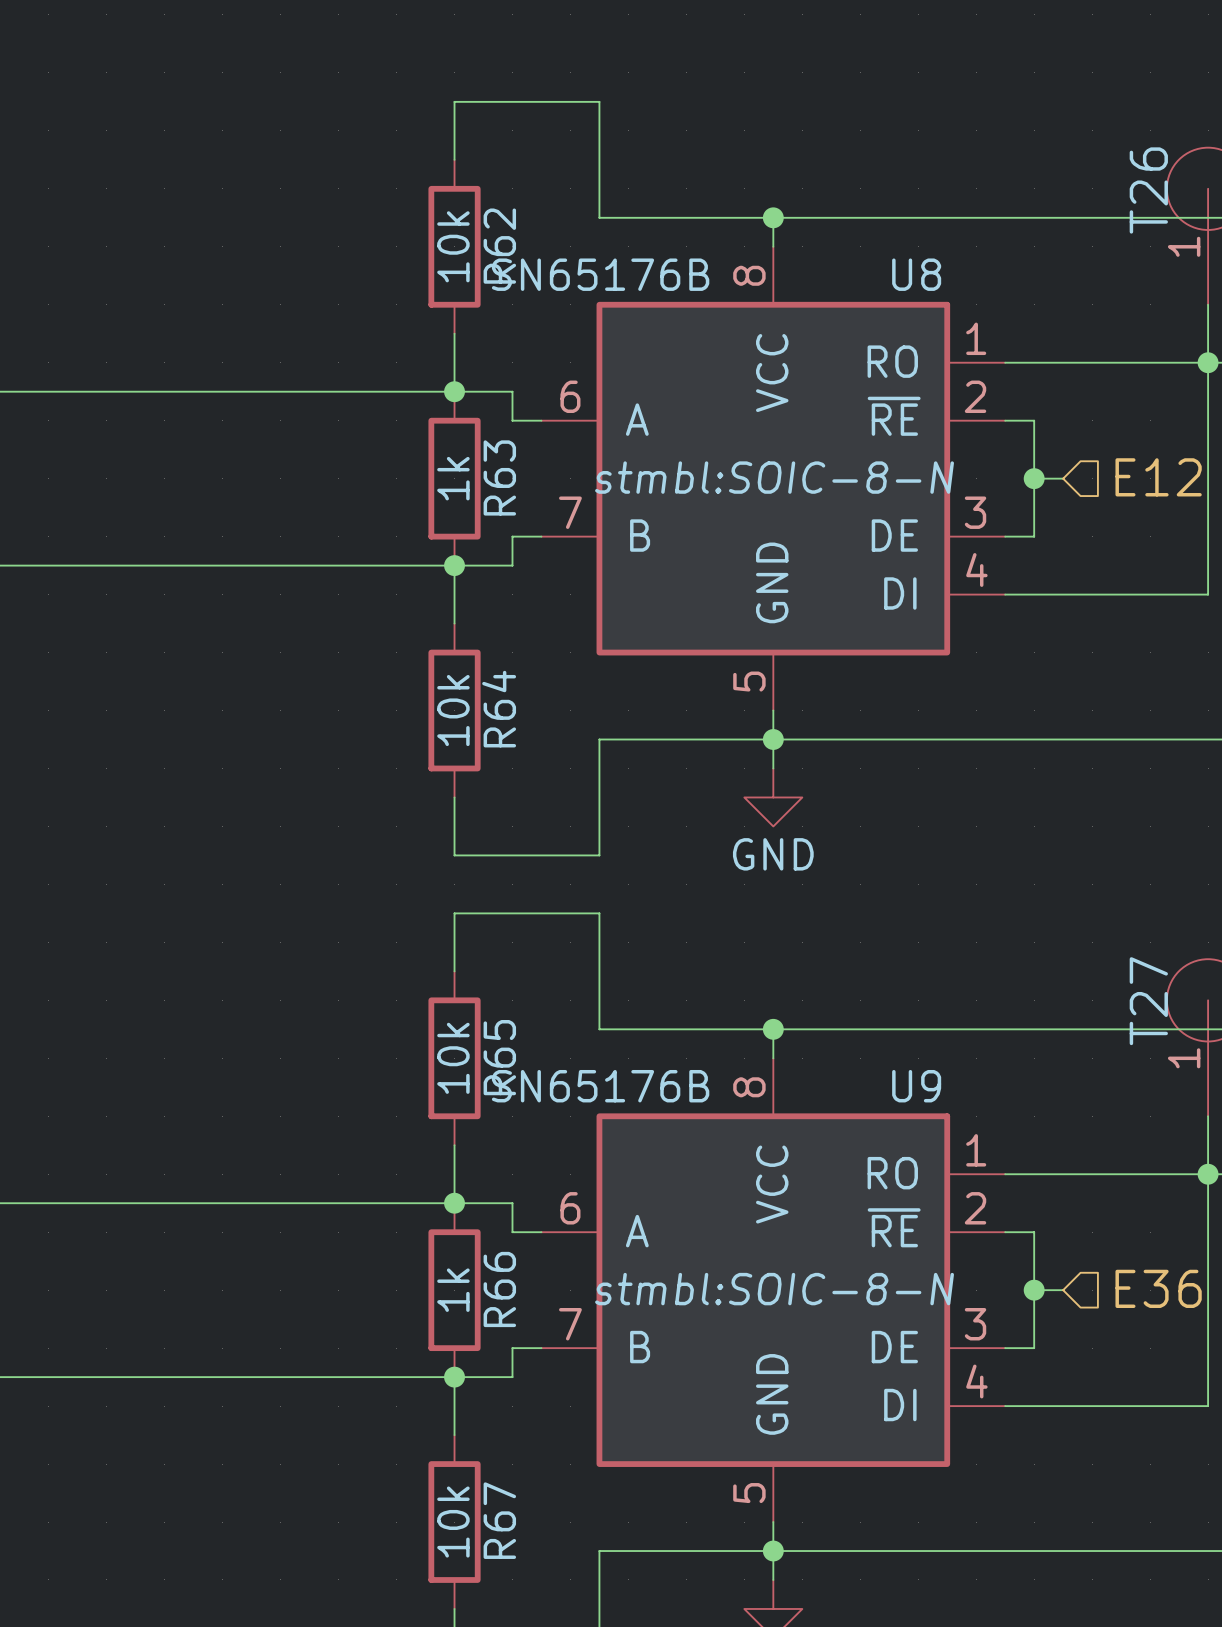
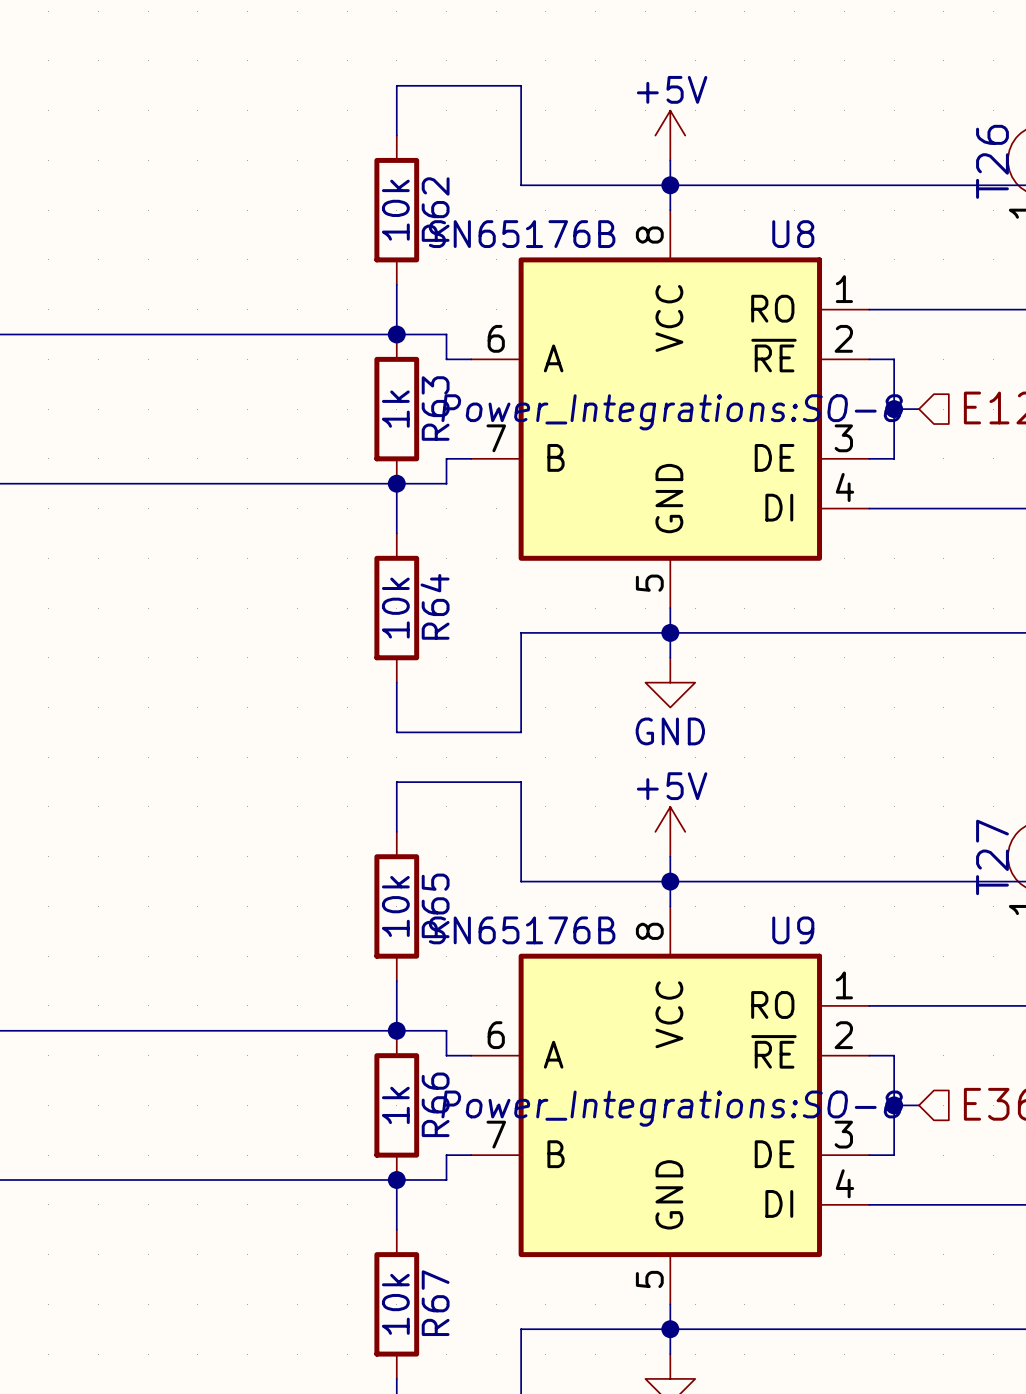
power symbol: none -> +5V (670, 135)
wire: none -> (670, 160) (670, 185)
U8 text: stmbl:SOIC-8-N (774, 477) -> Power_Integrations:SO-8 (672, 412)
power symbol: none -> +5V (670, 831)
wire: none -> (670, 856) (670, 881)
U9 text: stmbl:SOIC-8-N (774, 1289) -> Power_Integrations:SO-8 (672, 1108)

